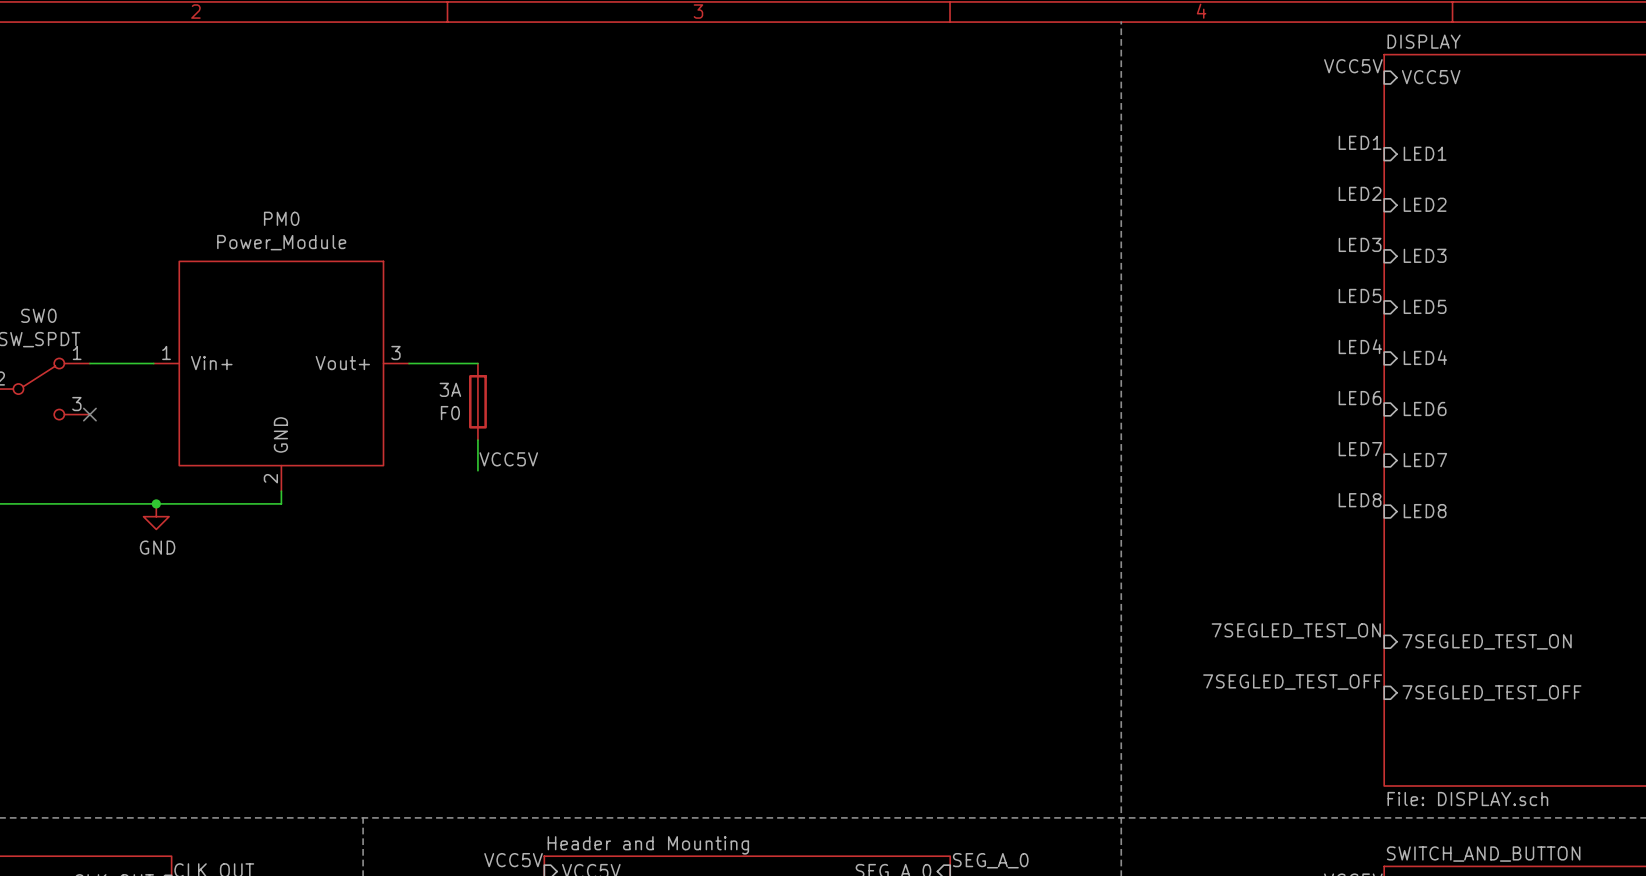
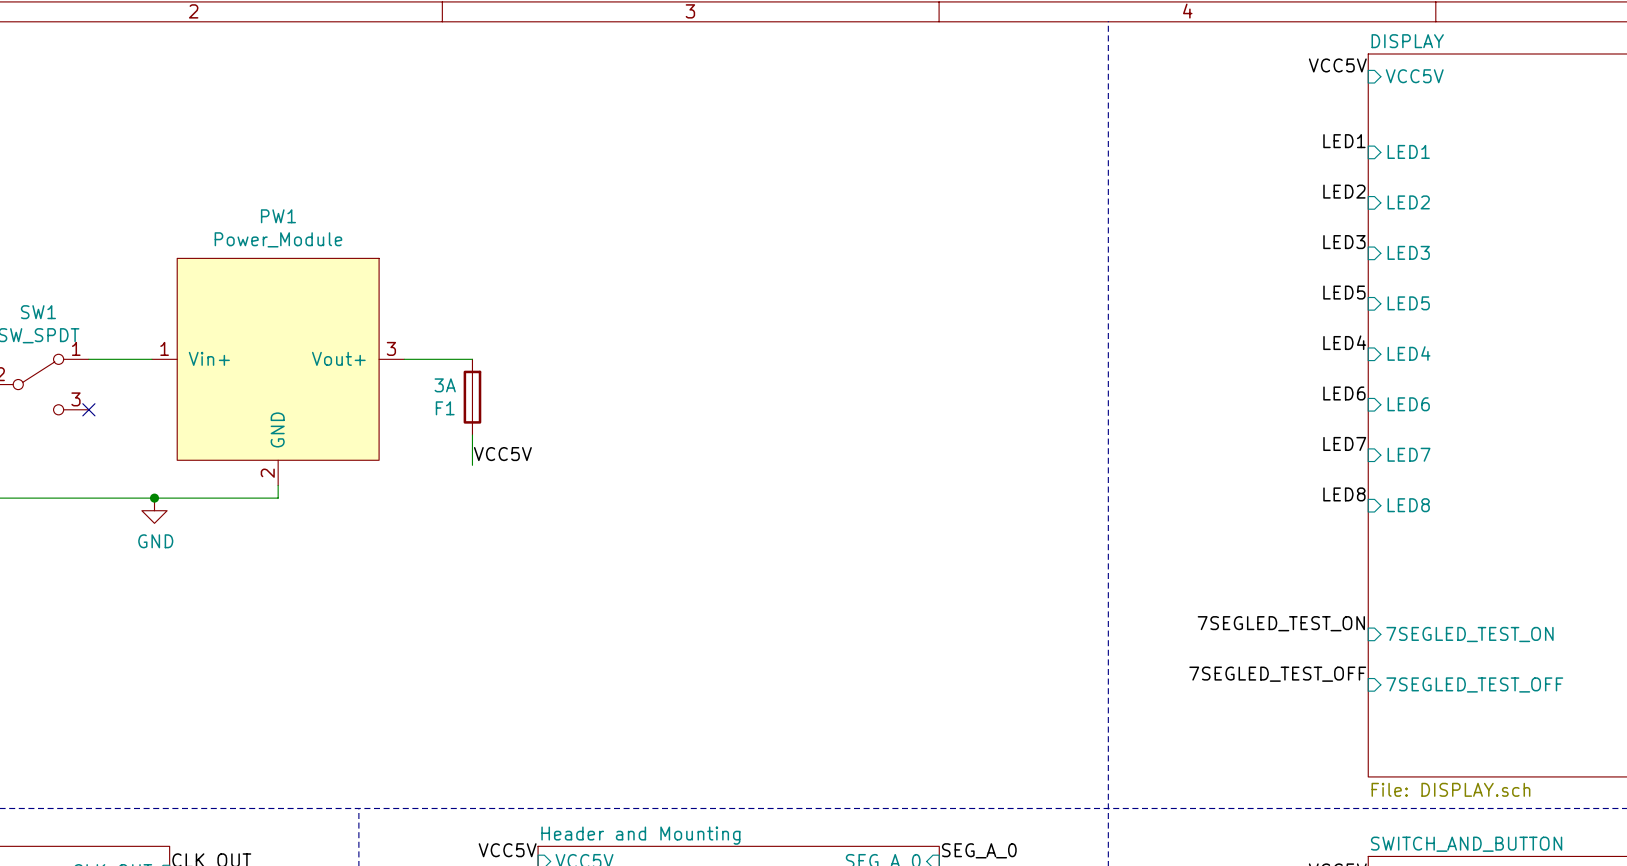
PM0 name: PM0 (281, 218) -> PW1 (278, 216)
SW0 name: SW0 (38, 315) -> SW1 (38, 312)
F0 name: F0 (450, 413) -> F1 (445, 408)

